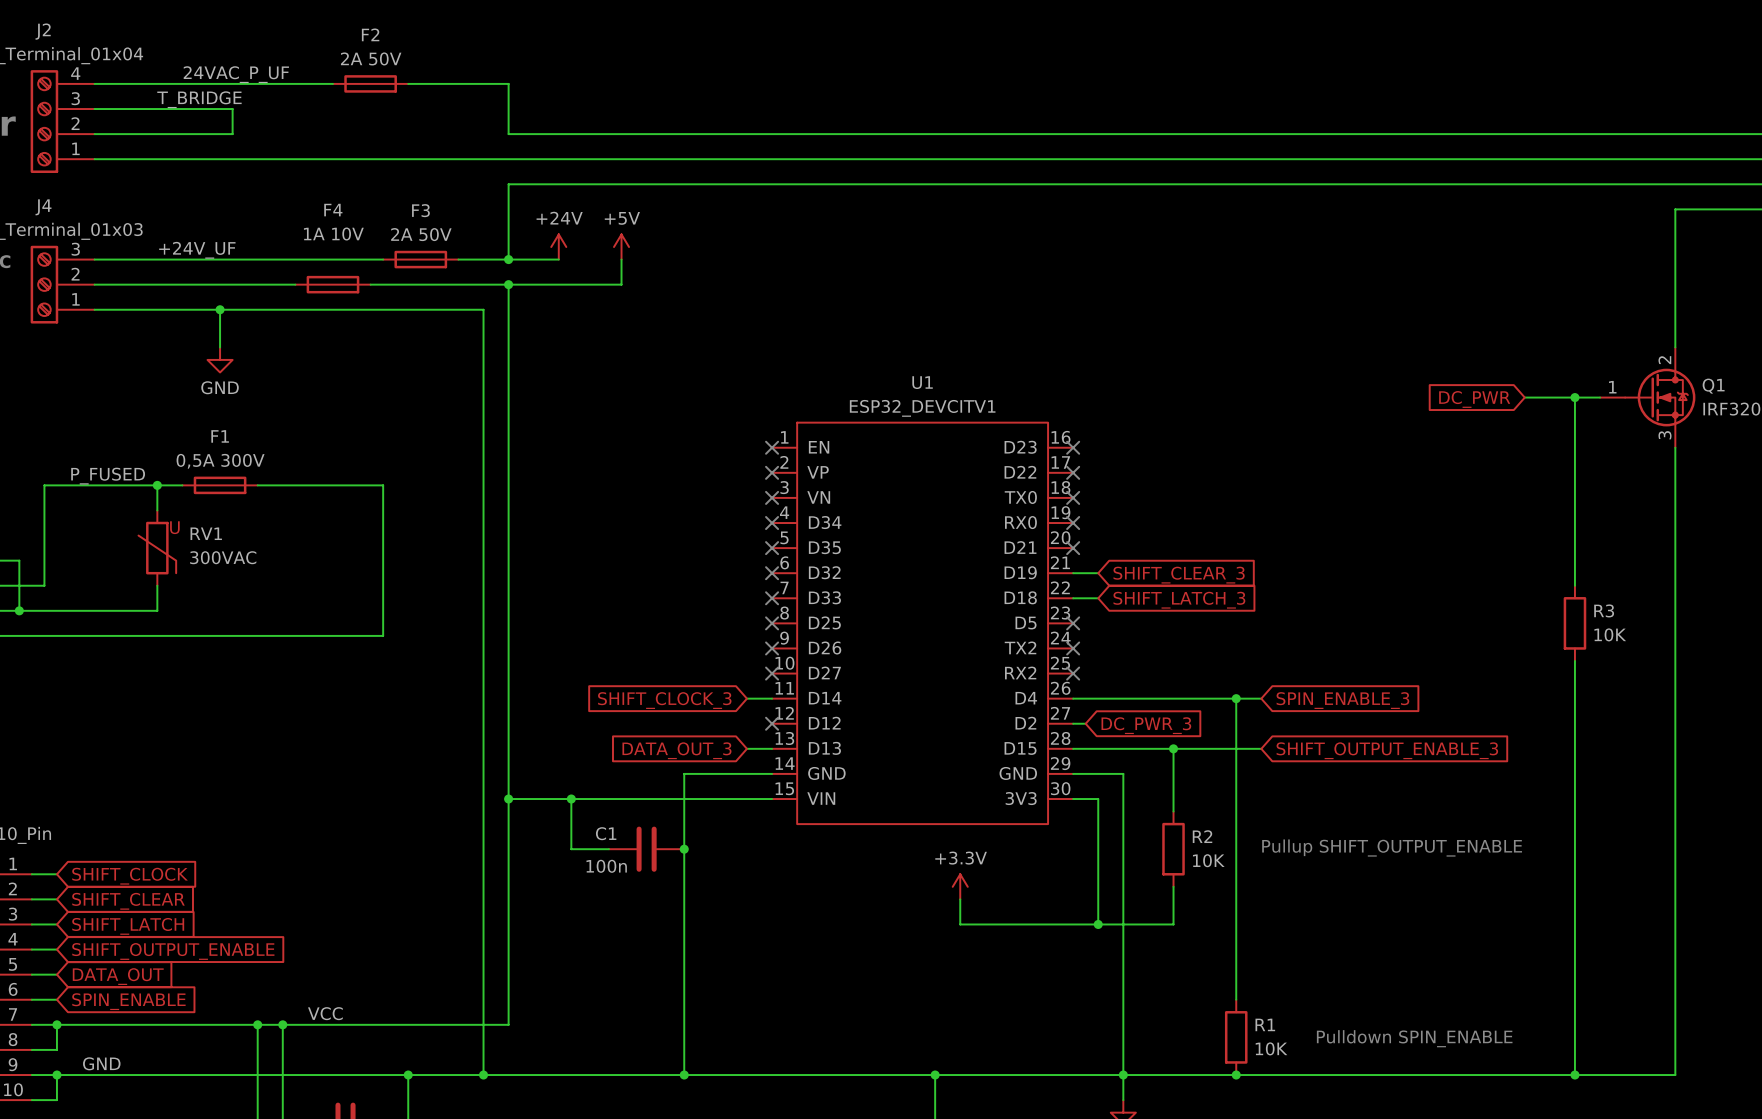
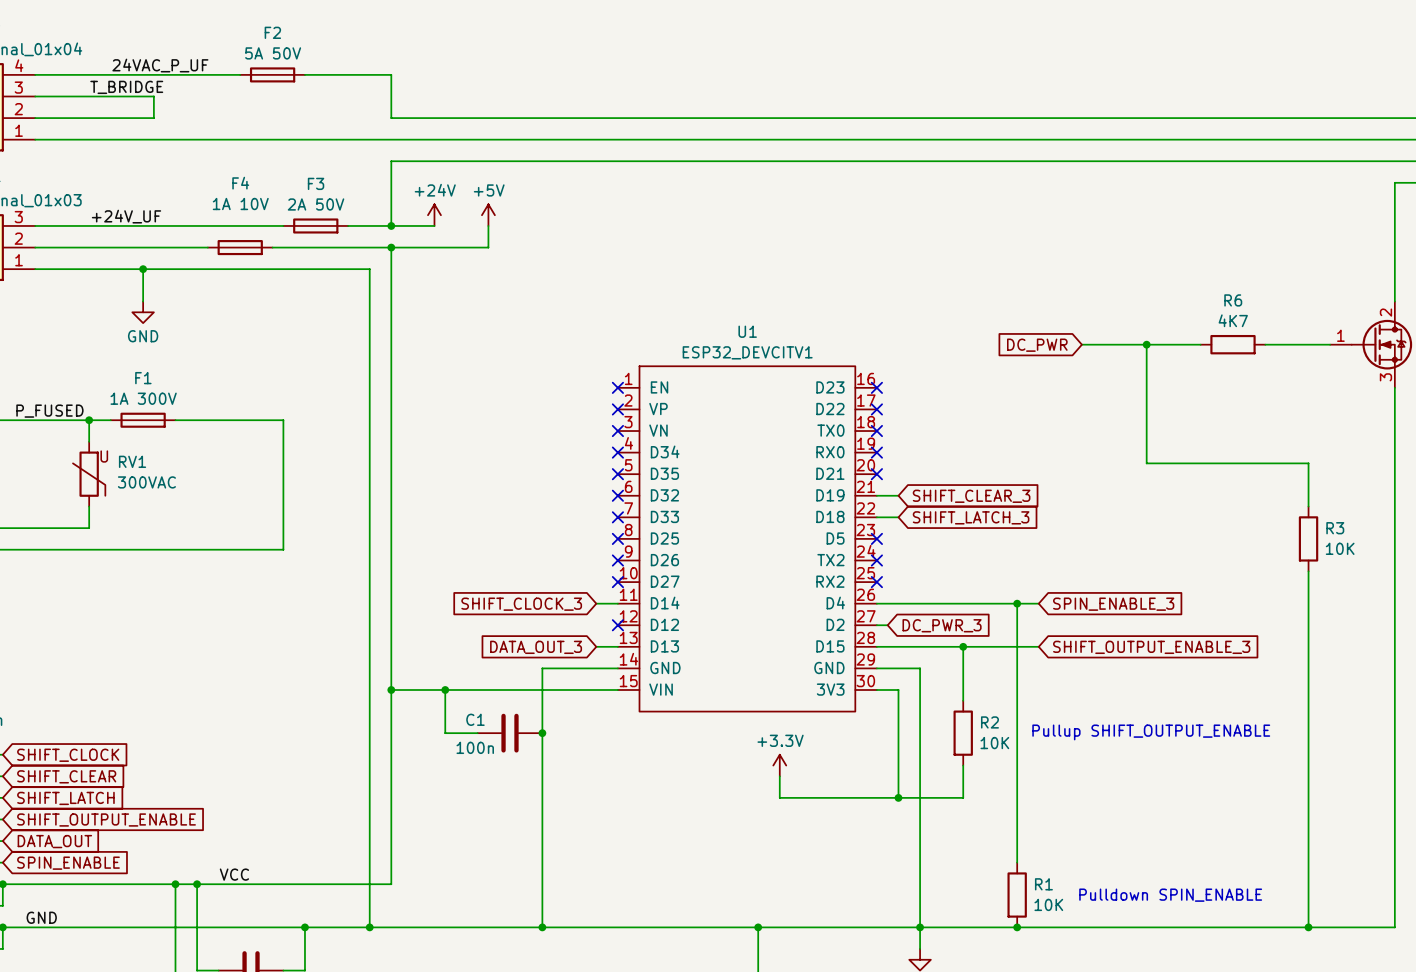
F2 value: 2A 50V (371, 58) -> 5A 50V (273, 53)
wire: none -> (1081, 344) (1200, 344)
junction: none -> (1146, 344)
R6: none -> 4K7 (1233, 344)
wire: (1574, 397) (1574, 535) -> (1146, 344) (1146, 463) (1308, 463)
junction: (1574, 397) -> none
global label position: DC_PWR (1474, 399) -> DC_PWR (1037, 345)
F1 value: 0,5A 300V (220, 461) -> 1A 300V (143, 398)

